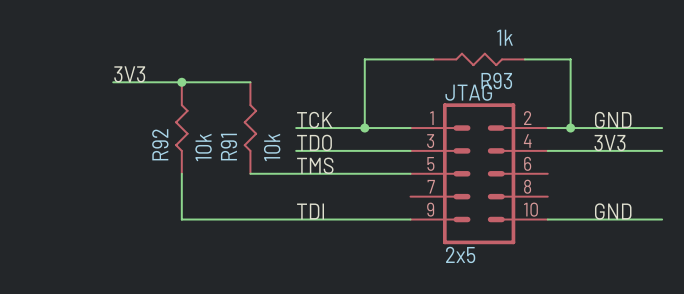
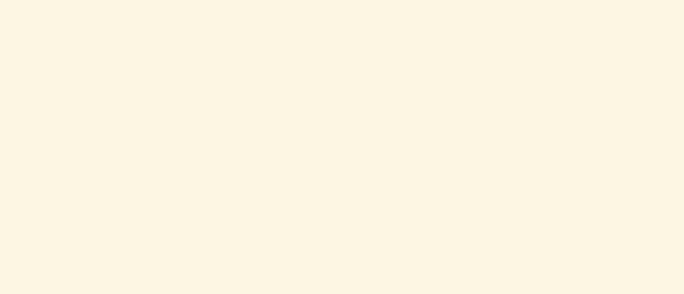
wire: (433, 59) (364, 59) (364, 128) -> none
R93: 1k (479, 59) -> none
wire: (524, 59) (570, 59) (570, 128) -> none
label: 3V3 (129, 74) -> none
wire: (113, 82) (250, 82) -> none
junction: (181, 82) -> none
label: TCK (314, 120) -> none
label: GND (613, 120) -> none
R92: 10k (181, 128) -> none
R91: 10k (250, 128) -> none
wire: (296, 128) (410, 128) -> none
junction: (364, 128) -> none
wire: (547, 128) (662, 128) -> none
junction: (570, 128) -> none
label: TDO (314, 142) -> none
label: 3V3 (610, 142) -> none
wire: (296, 150) (410, 150) -> none
wire: (547, 150) (662, 150) -> none
label: TMS (315, 165) -> none
wire: (181, 173) (181, 219) (410, 219) -> none
wire: (250, 173) (410, 173) -> none
JTAG: 2x5 (479, 173) -> none
label: TDI (310, 211) -> none
label: GND (613, 211) -> none
wire: (547, 219) (662, 219) -> none

